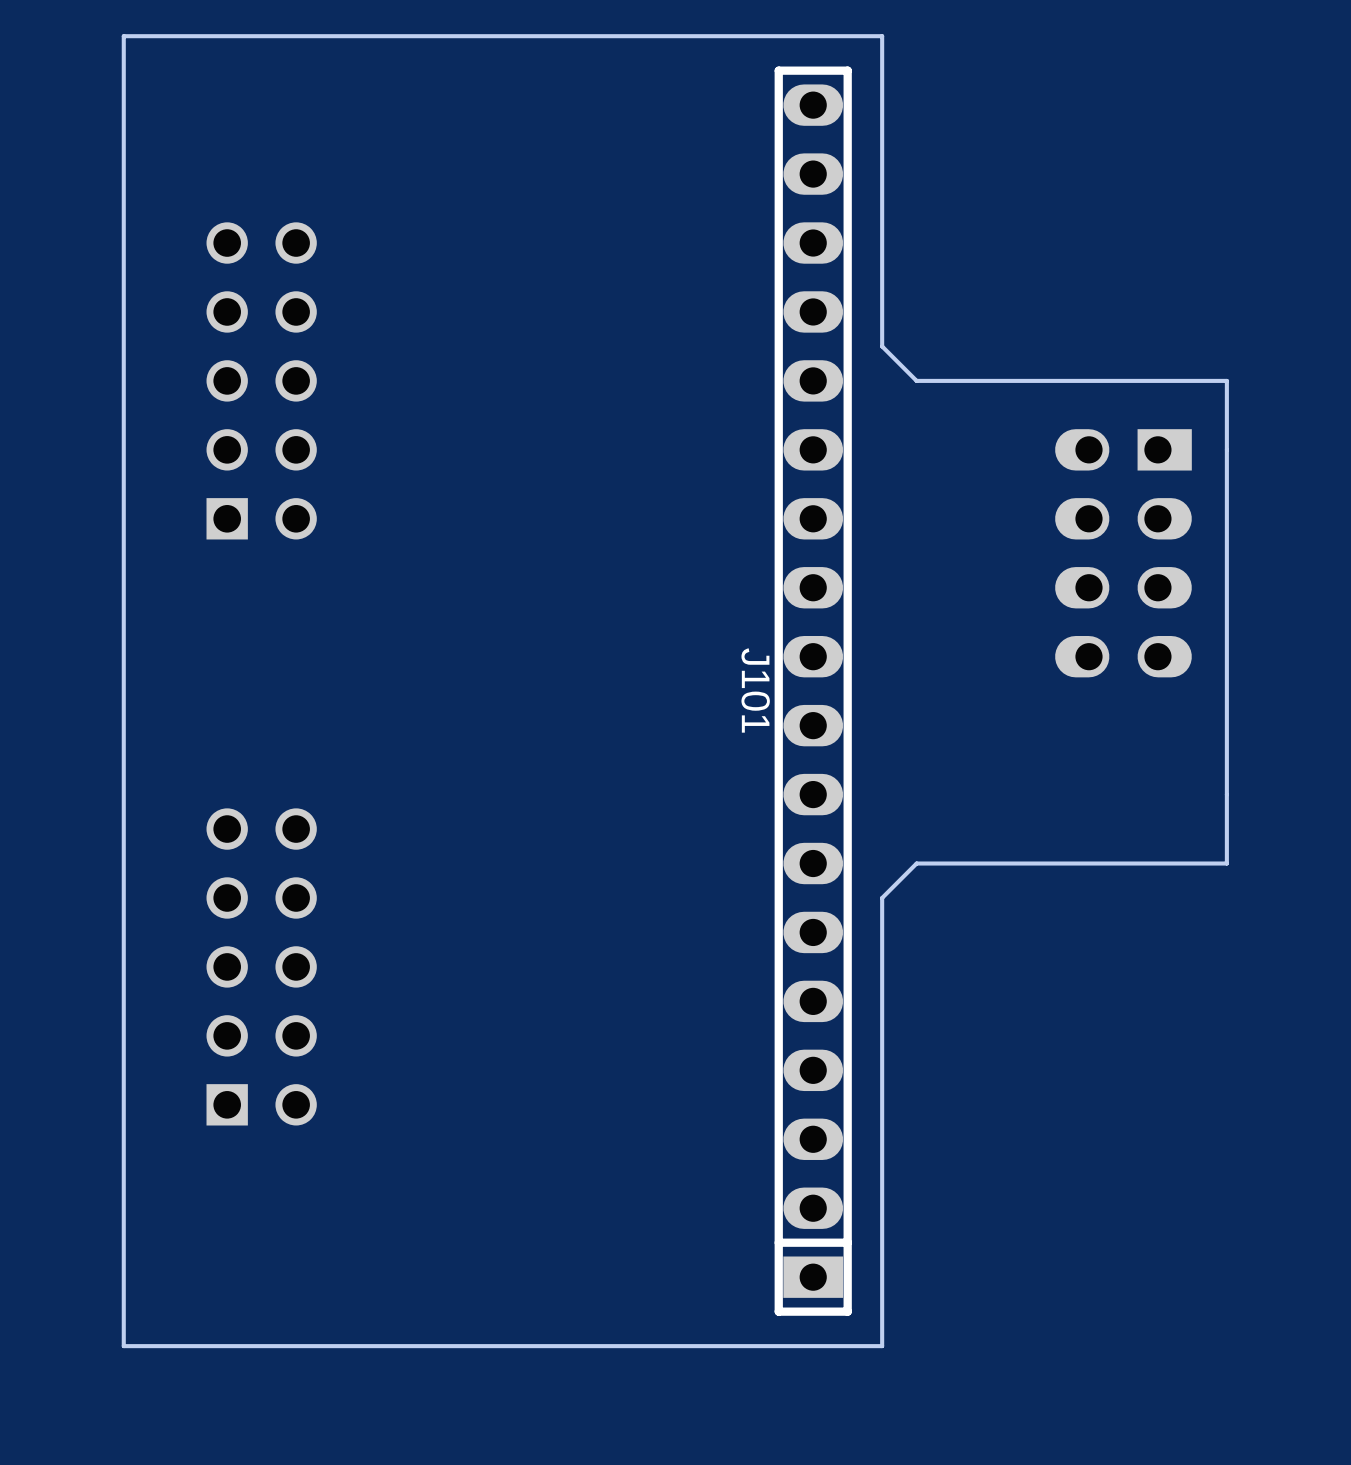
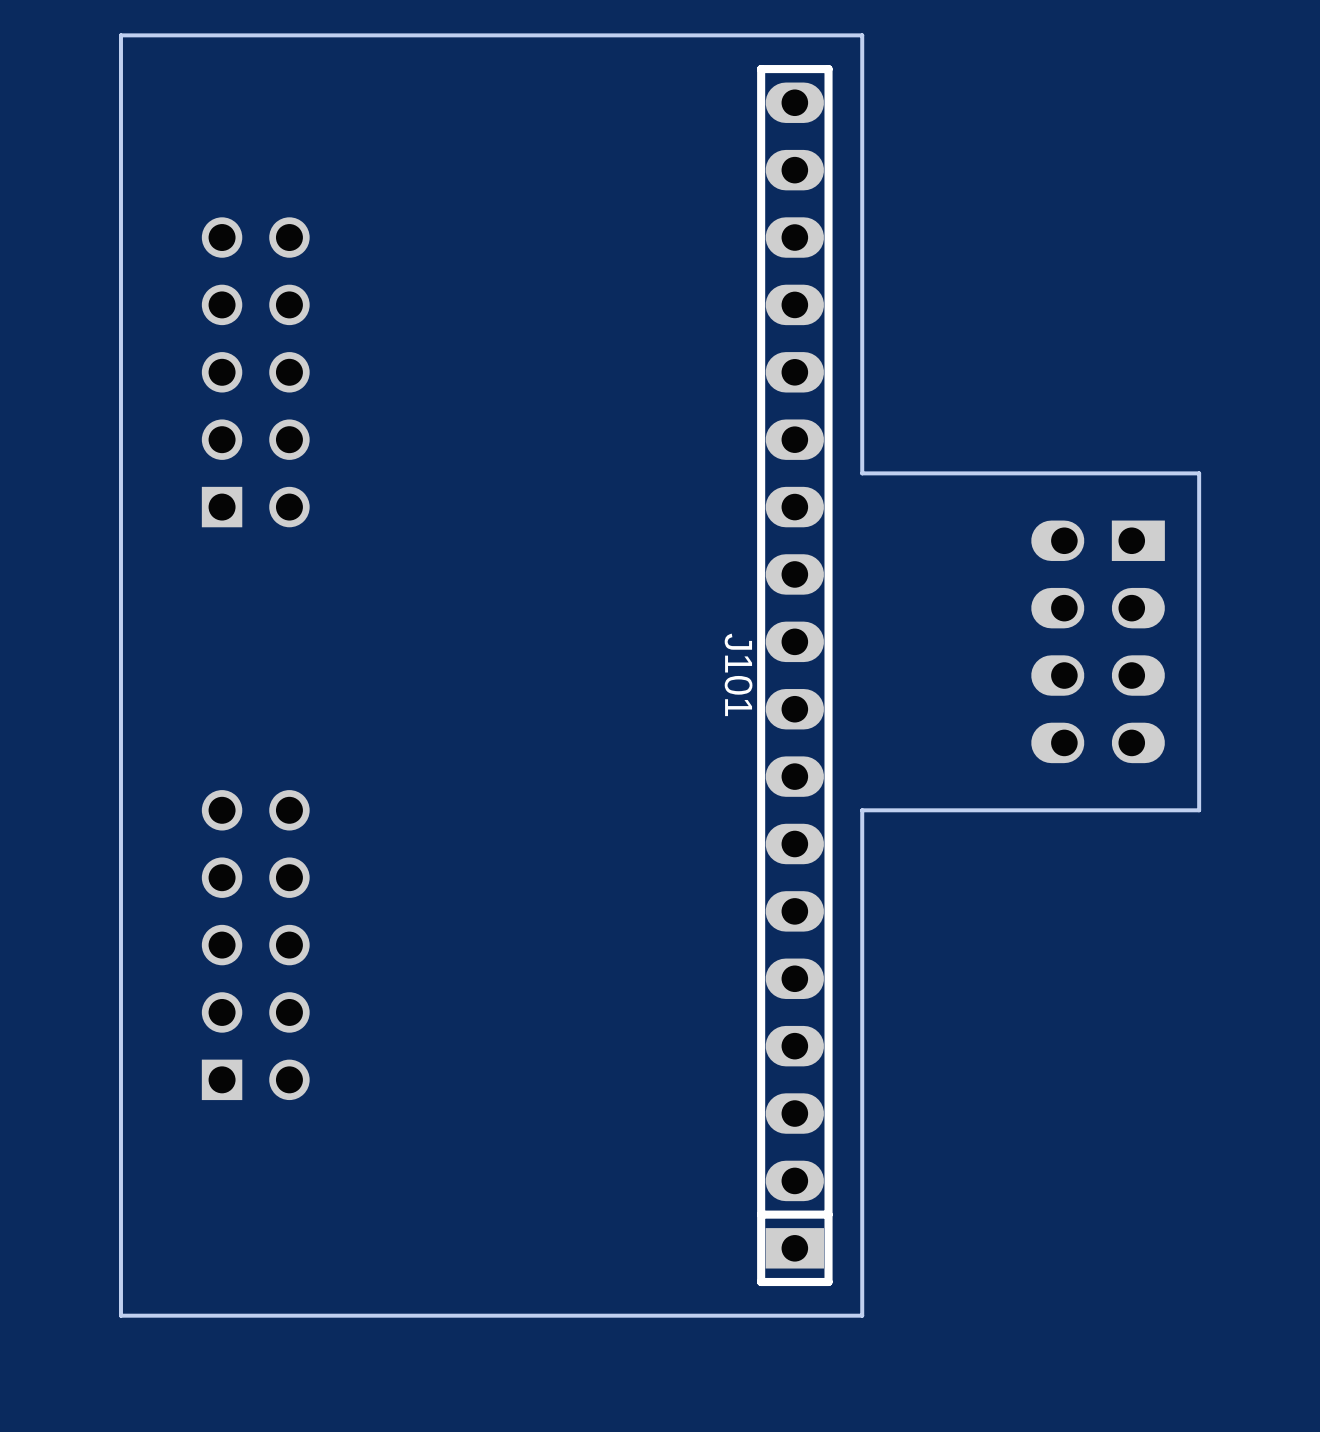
board edge: (882, 346) (916, 380) (1226, 380) (1226, 484) -> (862, 338) (862, 473) (1199, 473)
part position: (1123, 553) -> (1098, 641)
board edge: (1226, 829) (1226, 863) (916, 863) (882, 897) -> (1199, 810) (862, 810) (862, 877)

